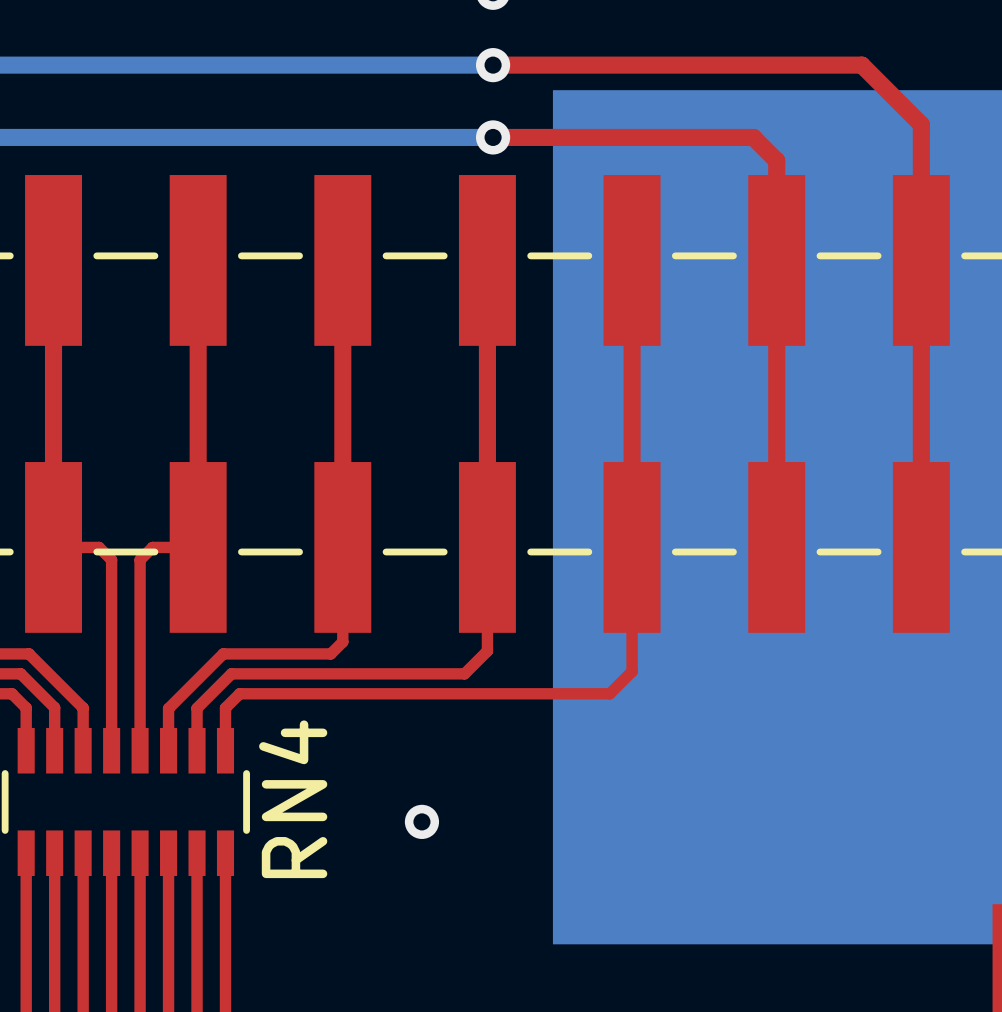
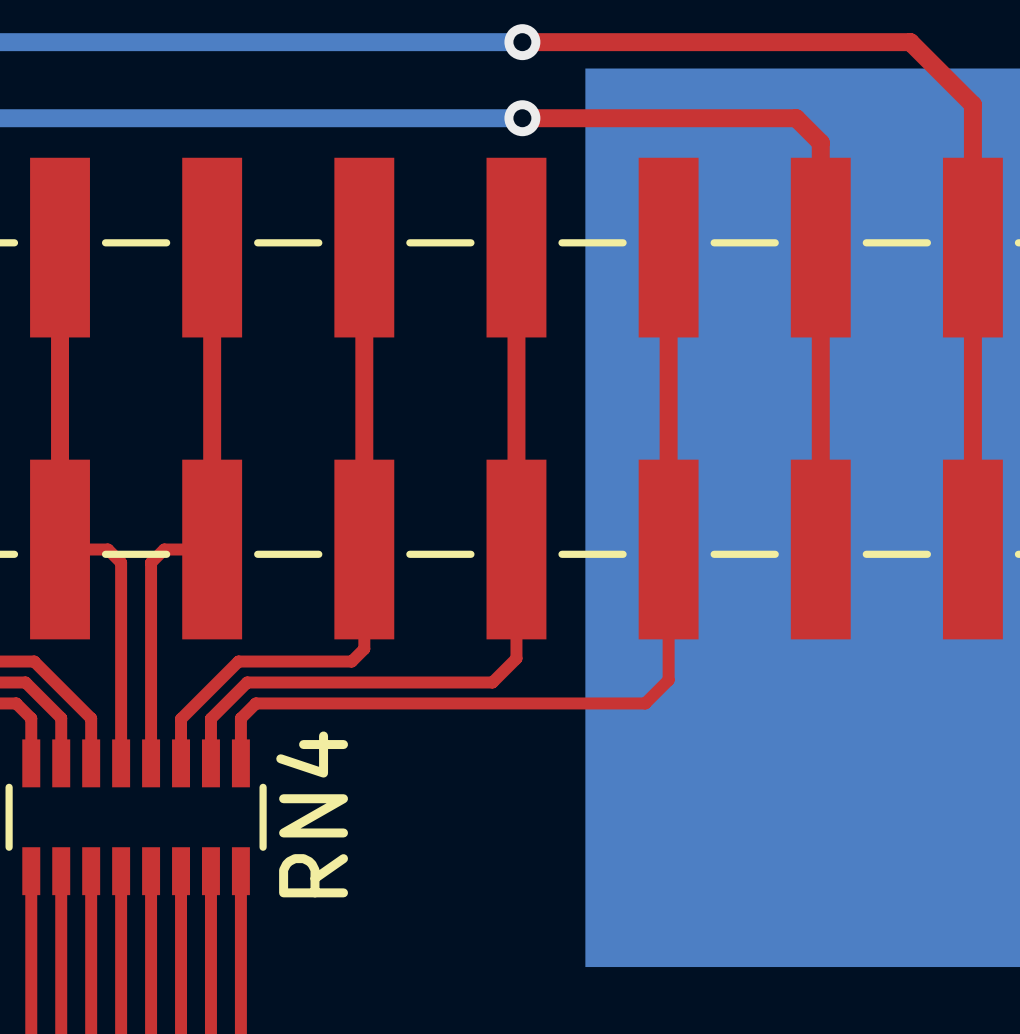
via: (421, 821) -> none

